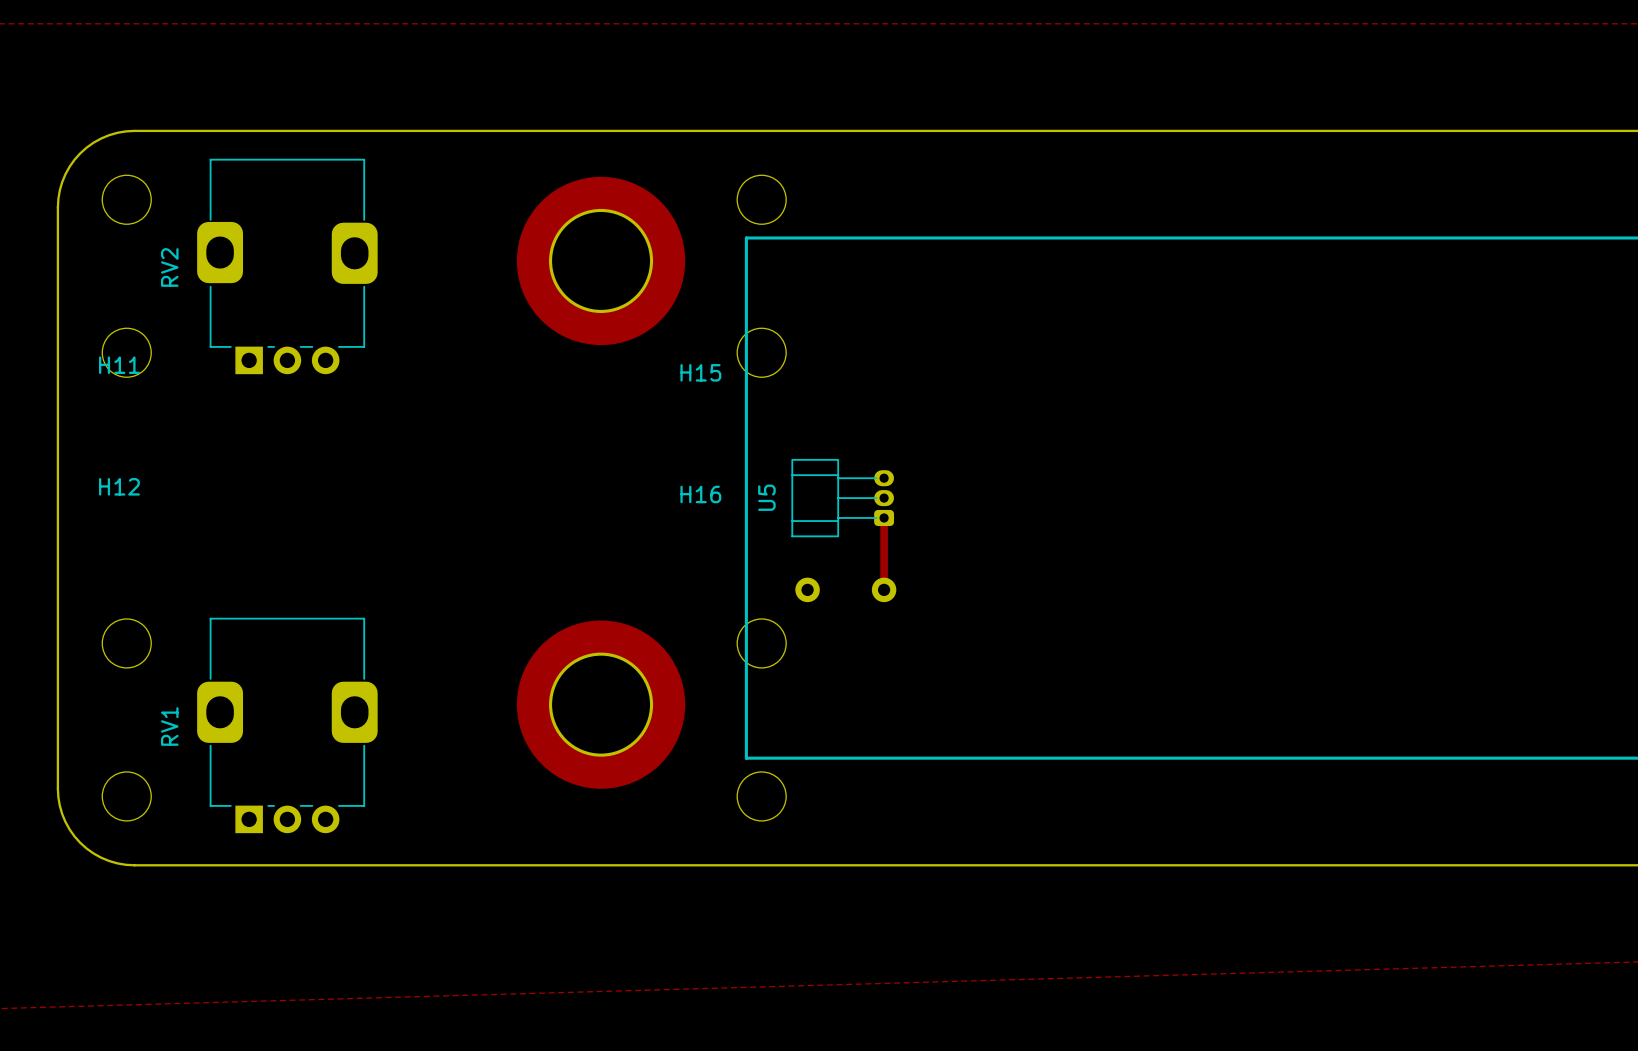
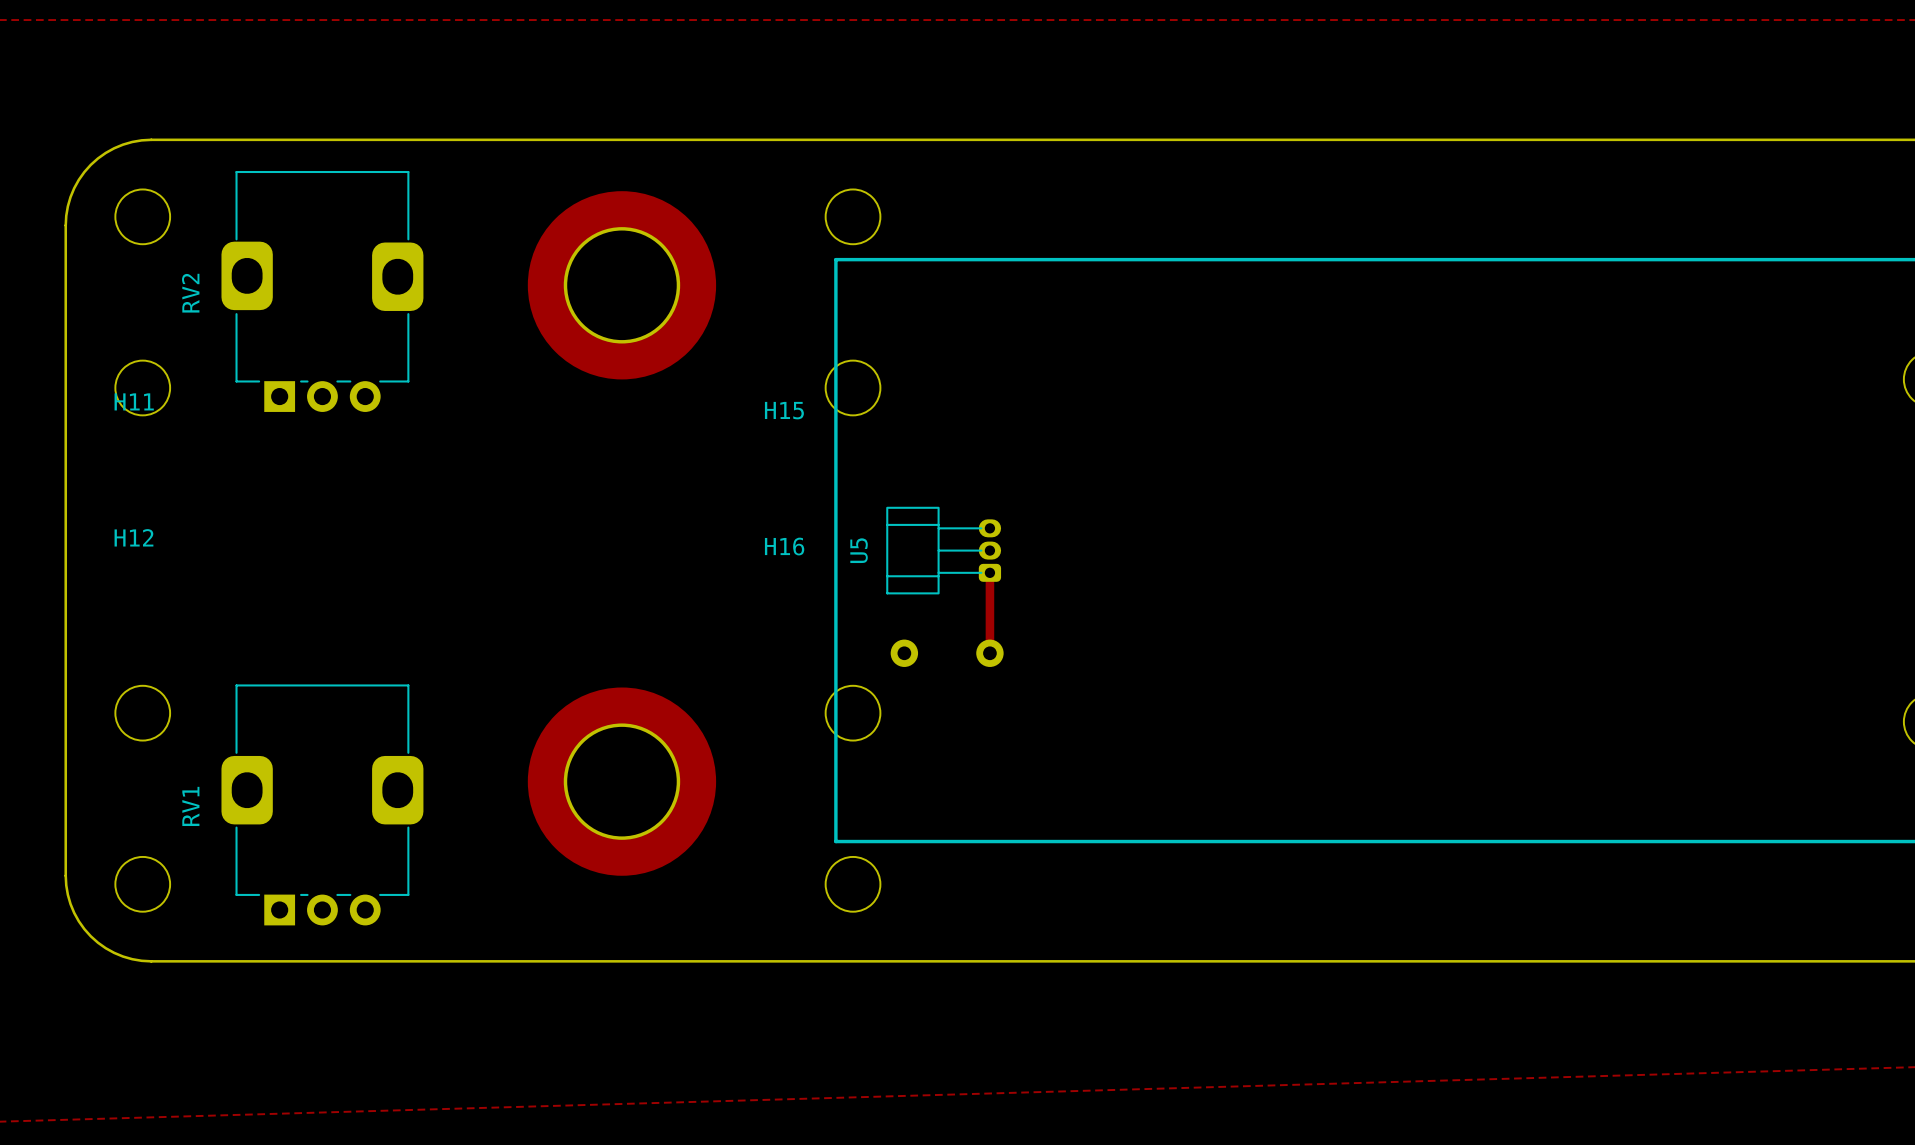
part position: (601, 260) -> (621, 285)
part position: (601, 704) -> (621, 781)

